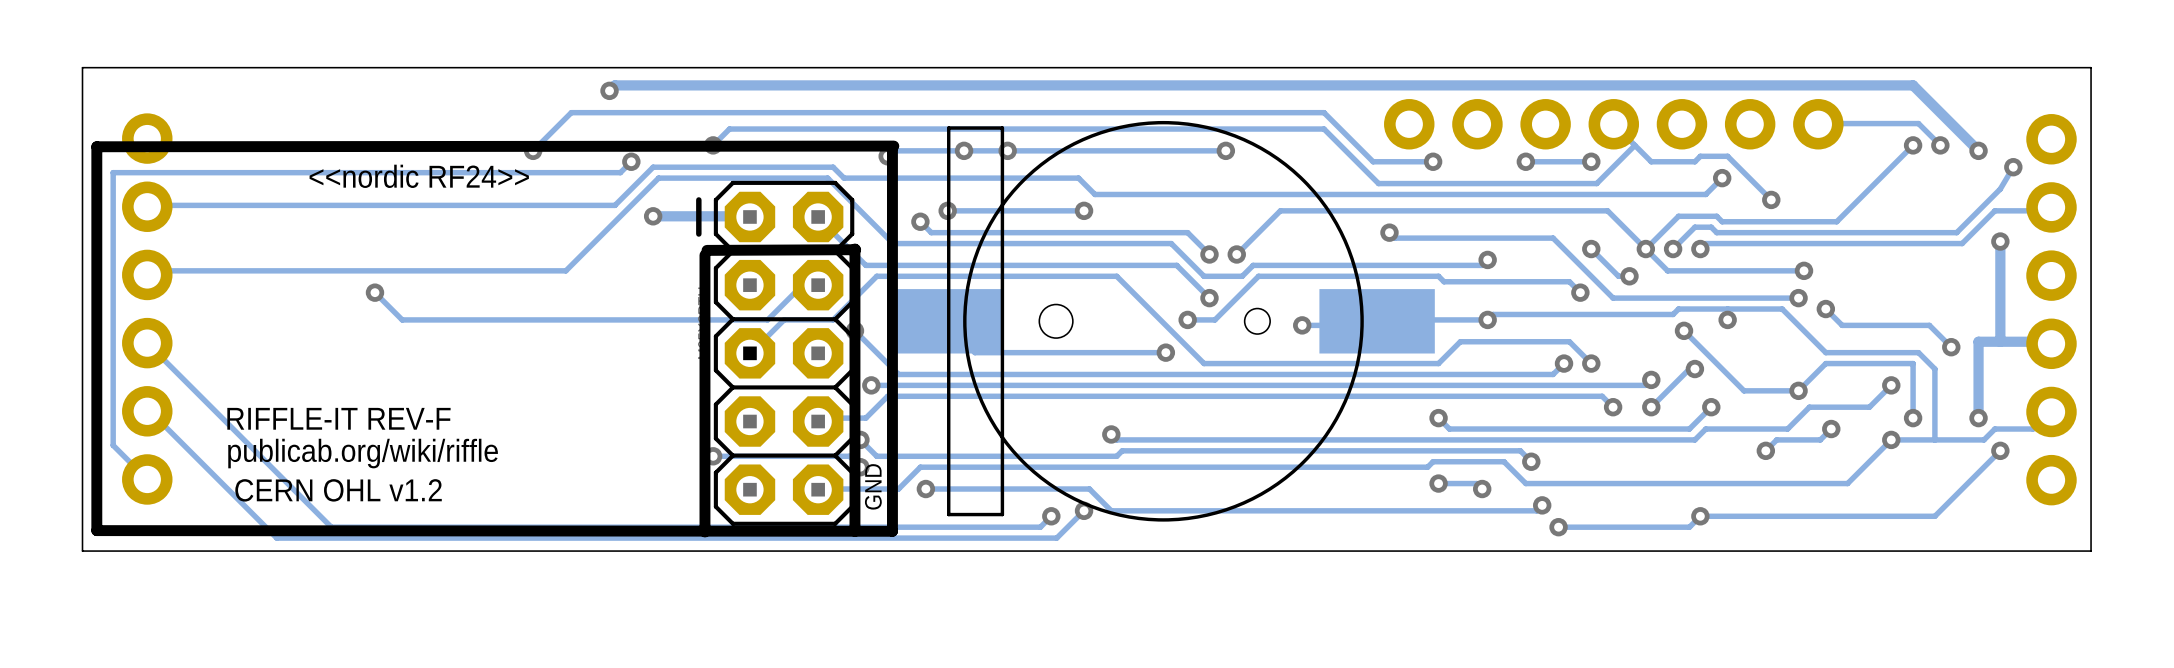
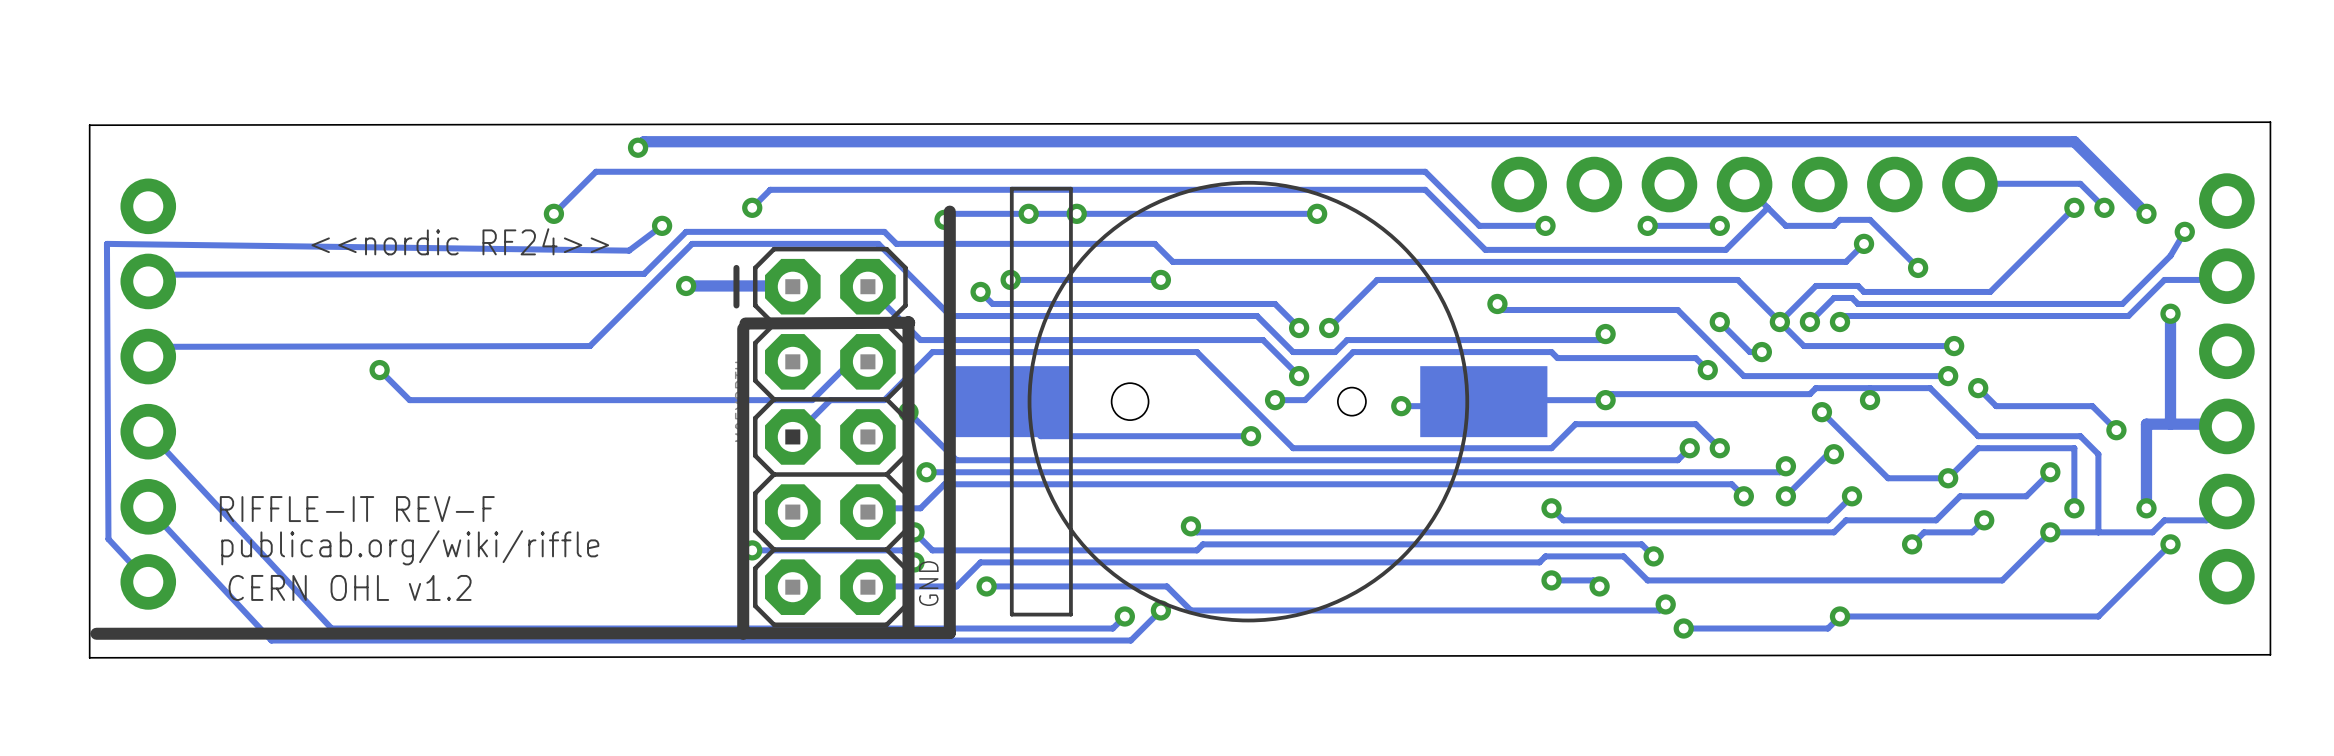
board edge: (2091, 67) (82, 67) (82, 551) (2091, 551) -> (2270, 122) (89, 125) (89, 657) (2270, 654)
line: (893, 146) (96, 146) (96, 530) (892, 531) -> (96, 633) (949, 633)
track: (631, 161) (620, 172) (113, 172) (113, 445) (147, 479) -> (662, 225) (629, 250) (106, 243) (108, 539) (148, 581)
track: (614, 205) (147, 206) -> (644, 273) (163, 274) (148, 281)
track: (565, 270) (151, 270) (147, 274) -> (589, 346) (167, 346) (148, 356)
part position: (147, 309) -> (148, 394)
track: (147, 343) (331, 527) -> (148, 431) (331, 628)
track: (147, 411) (151, 412) (276, 538) -> (148, 506) (271, 640)

